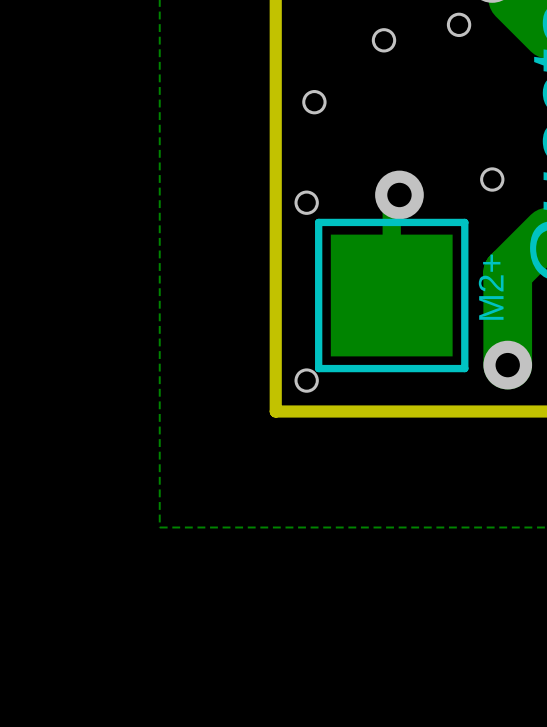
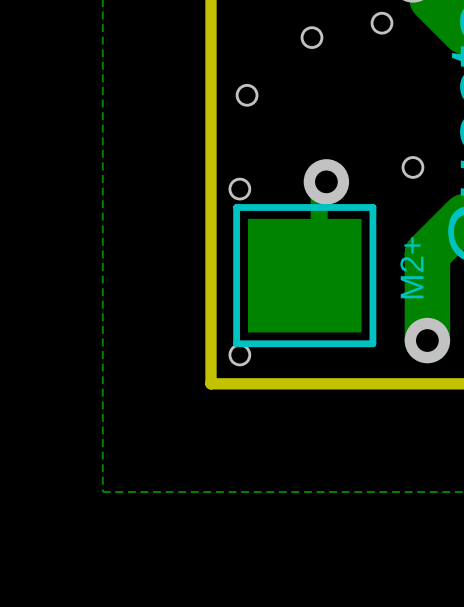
part position: (391, 295) -> (304, 275)

